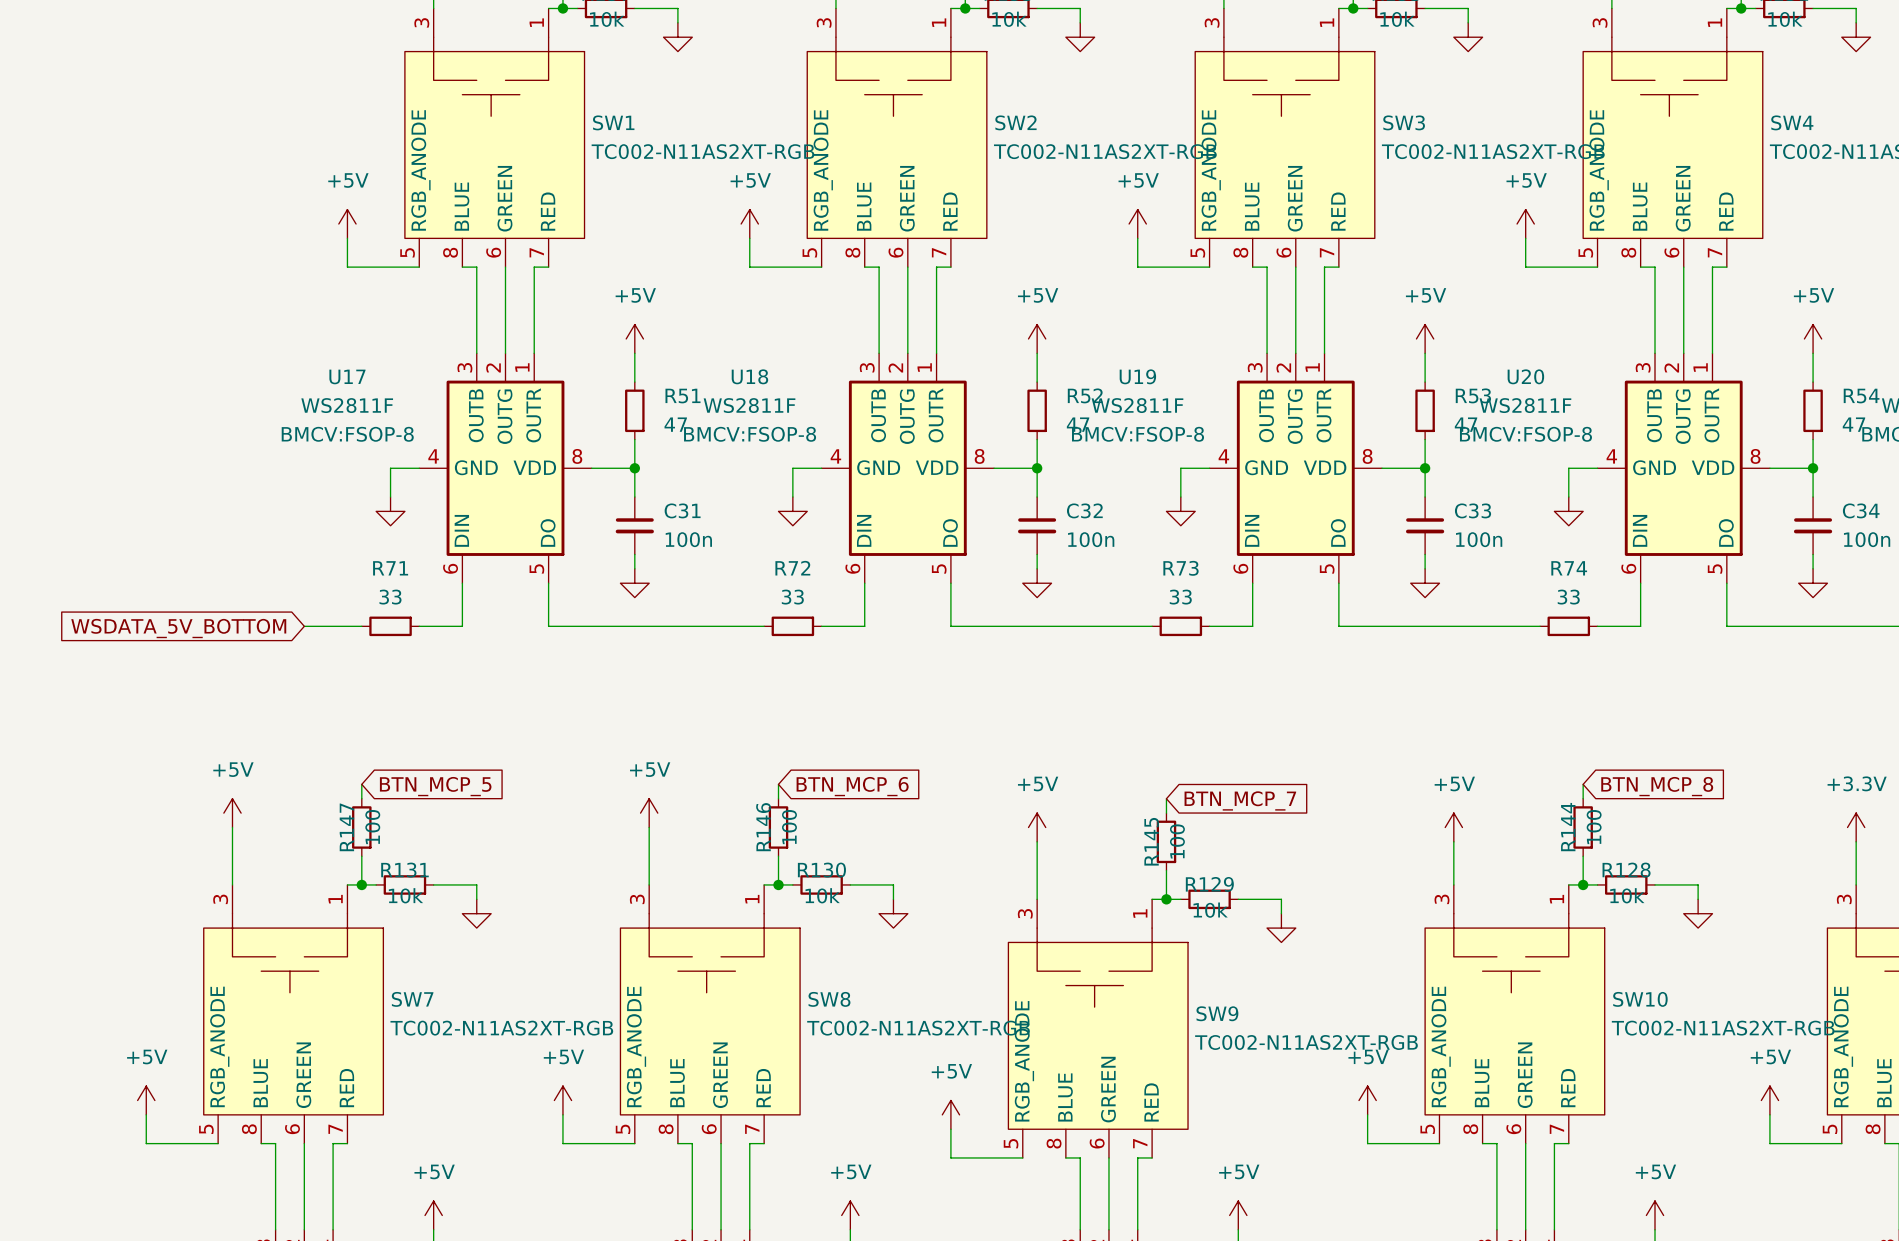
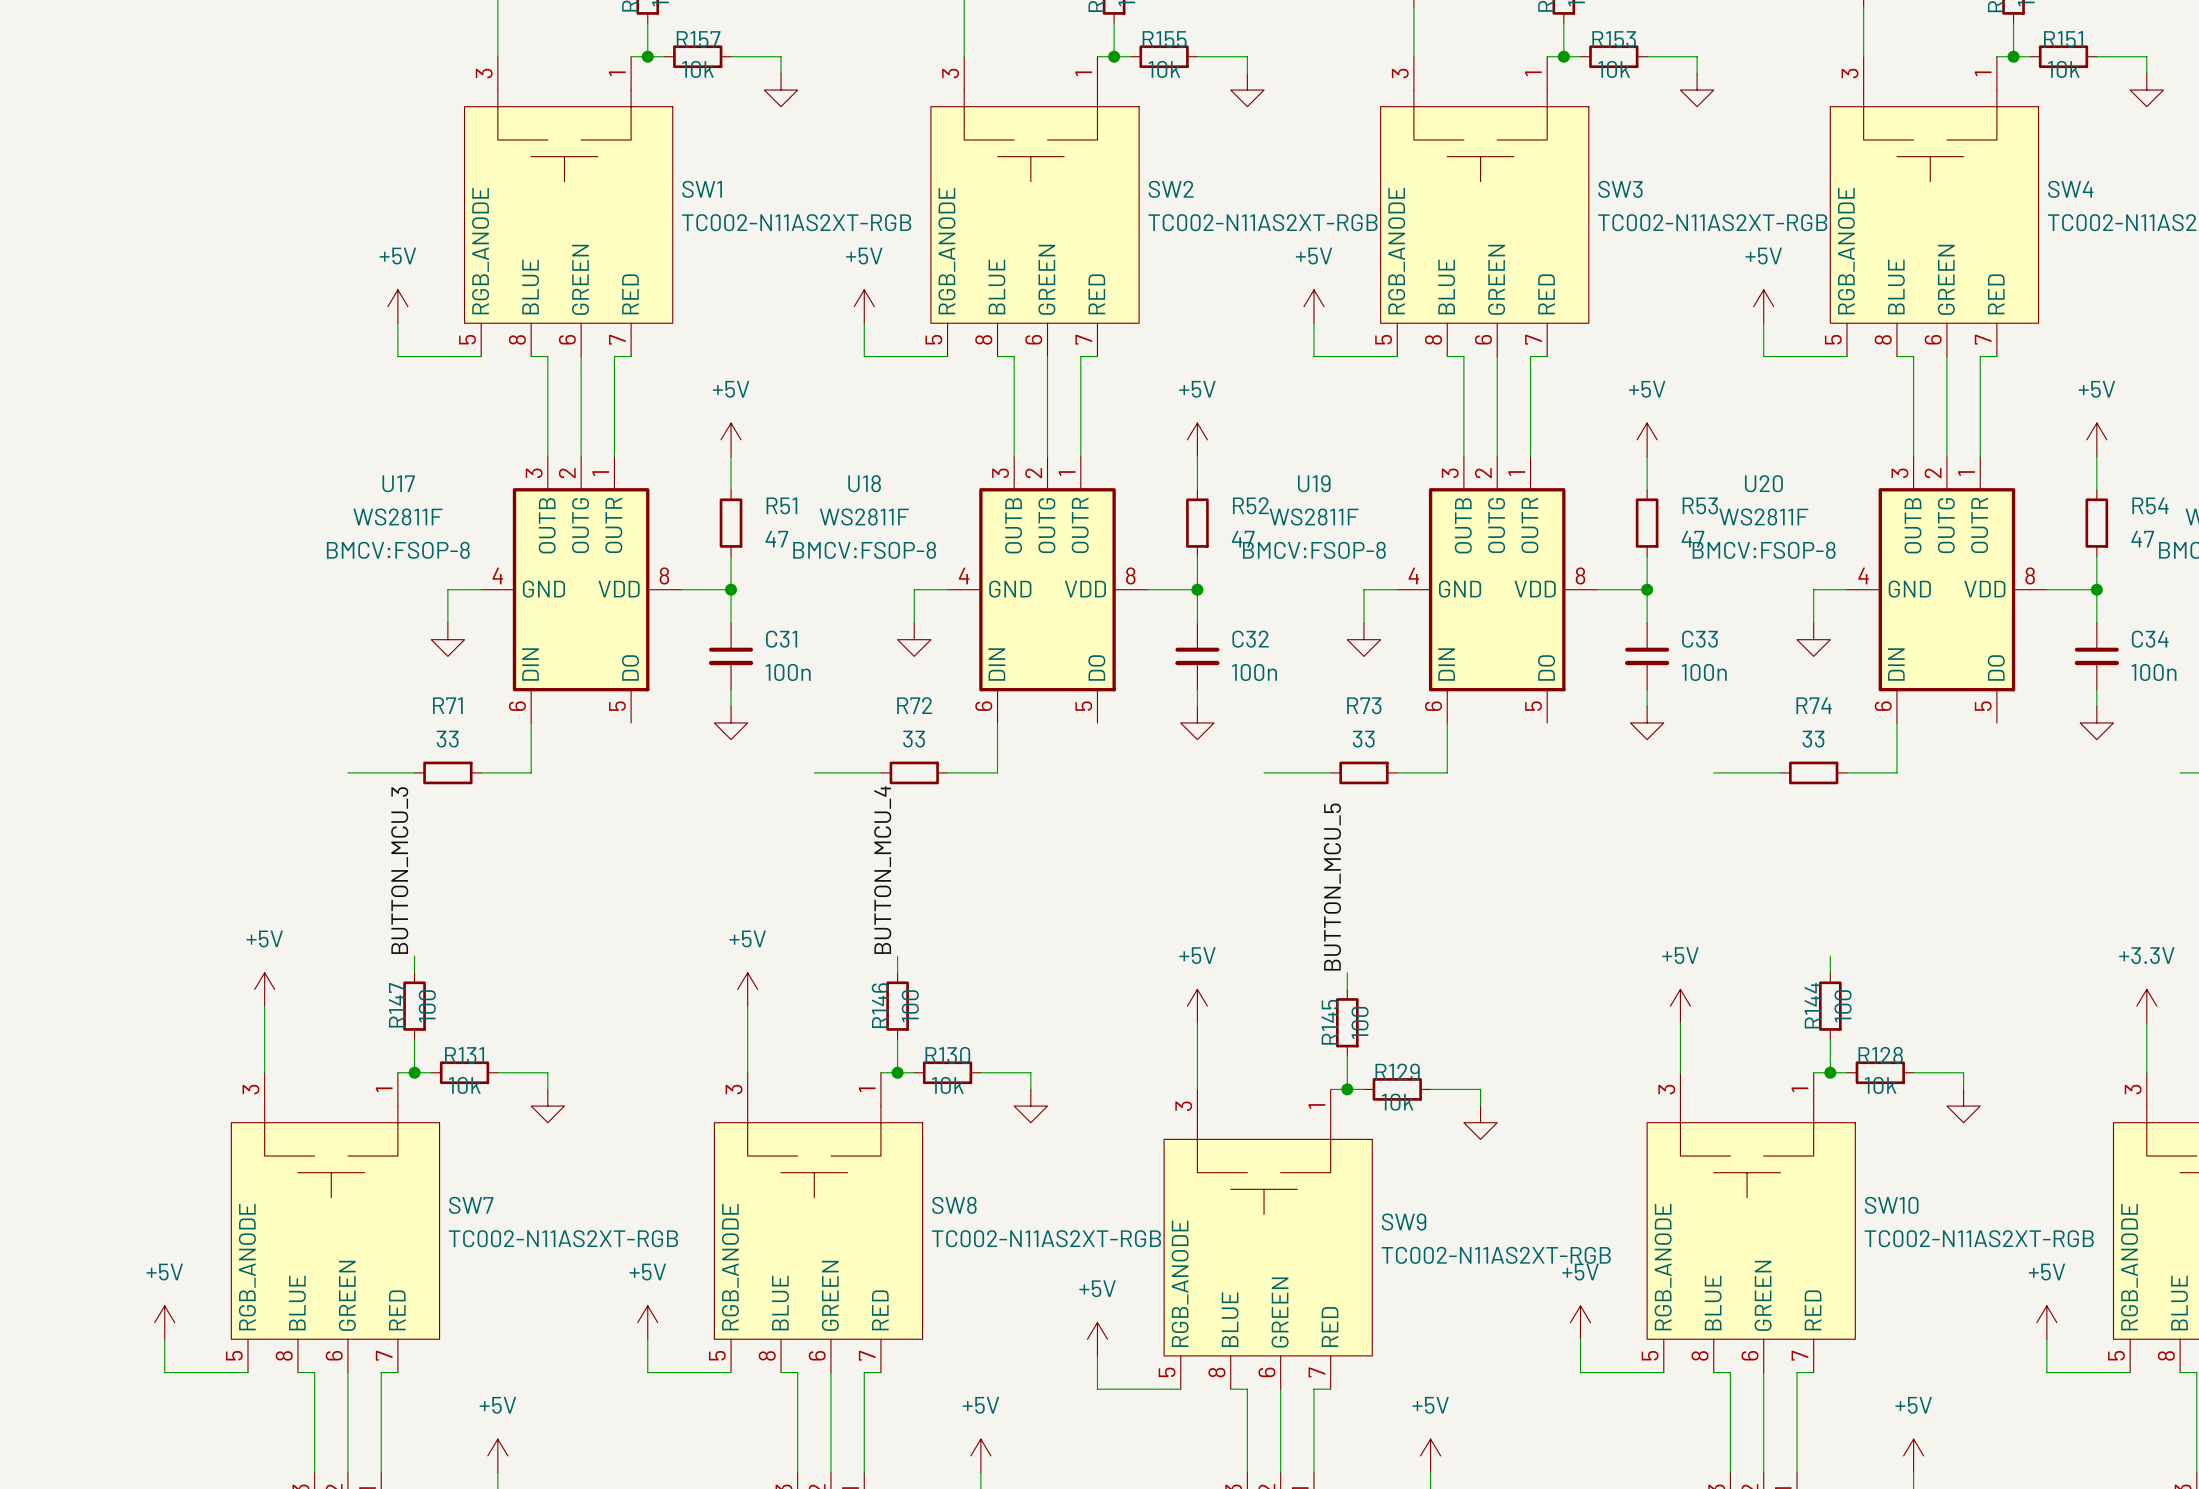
wire: (548, 583) (548, 626) (706, 626) -> none
wire: (950, 583) (950, 626) (1094, 626) -> none
wire: (1338, 583) (1338, 626) (1482, 626) -> none
wire: (1726, 583) (1726, 626) (1884, 626) -> none
global label: WSDATA_5V_BOTTOM (178, 628) -> none
label: none -> BUTTON_MCU_3 (399, 870)
label: none -> BUTTON_MCU_4 (882, 870)
label: none -> BUTTON_MCU_5 (1332, 887)
global label: BTN_MCP_5 (435, 786) -> none
global label: BTN_MCP_6 (852, 786) -> none
global label: BTN_MCP_8 (1657, 786) -> none
global label: BTN_MCP_7 (1240, 800) -> none

